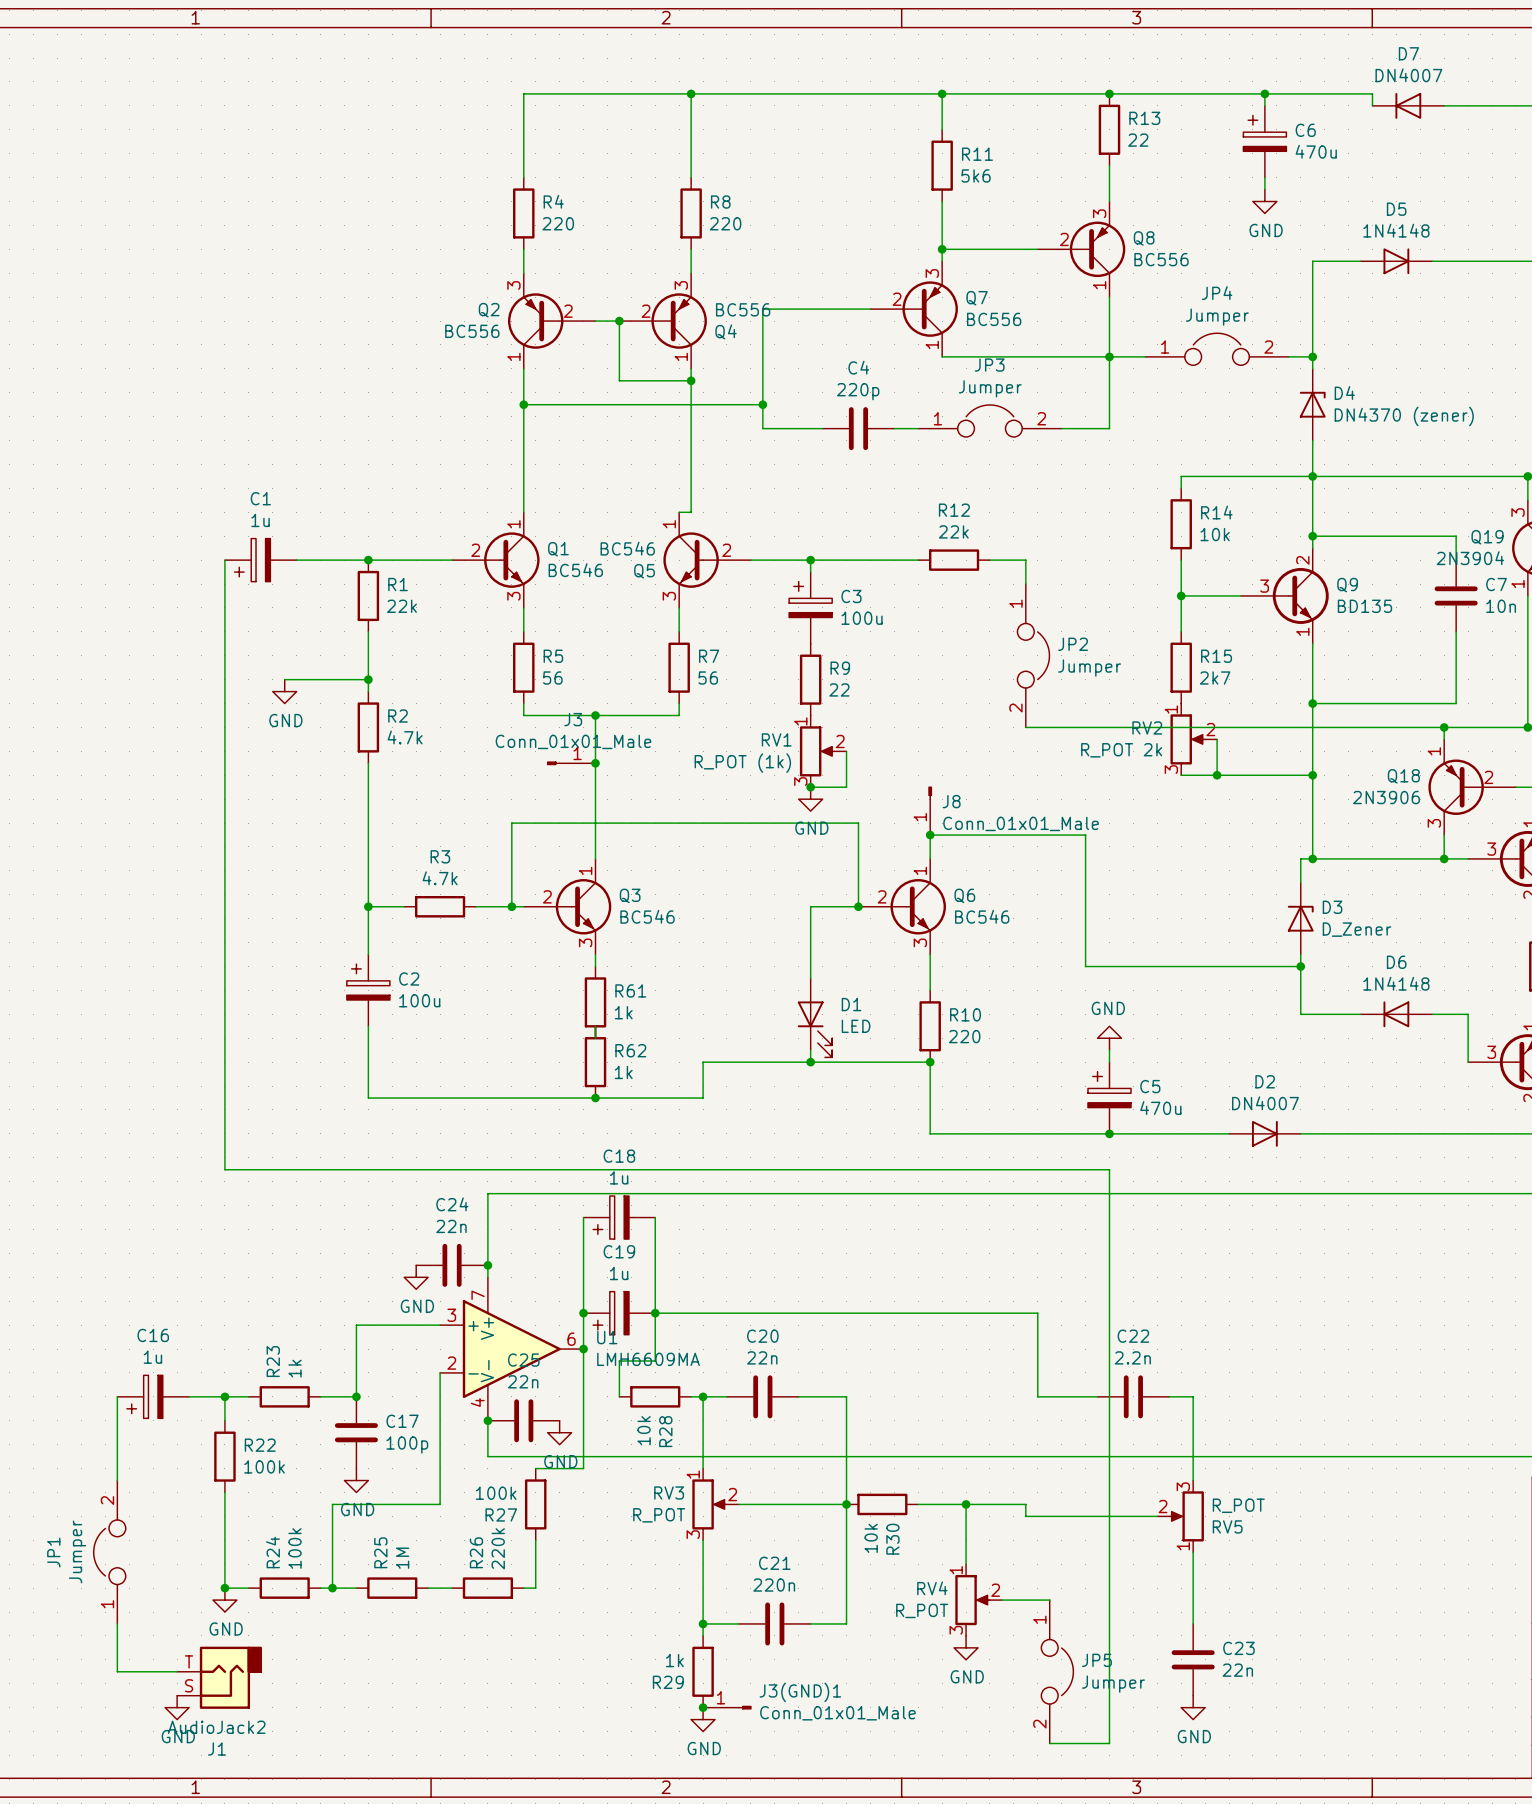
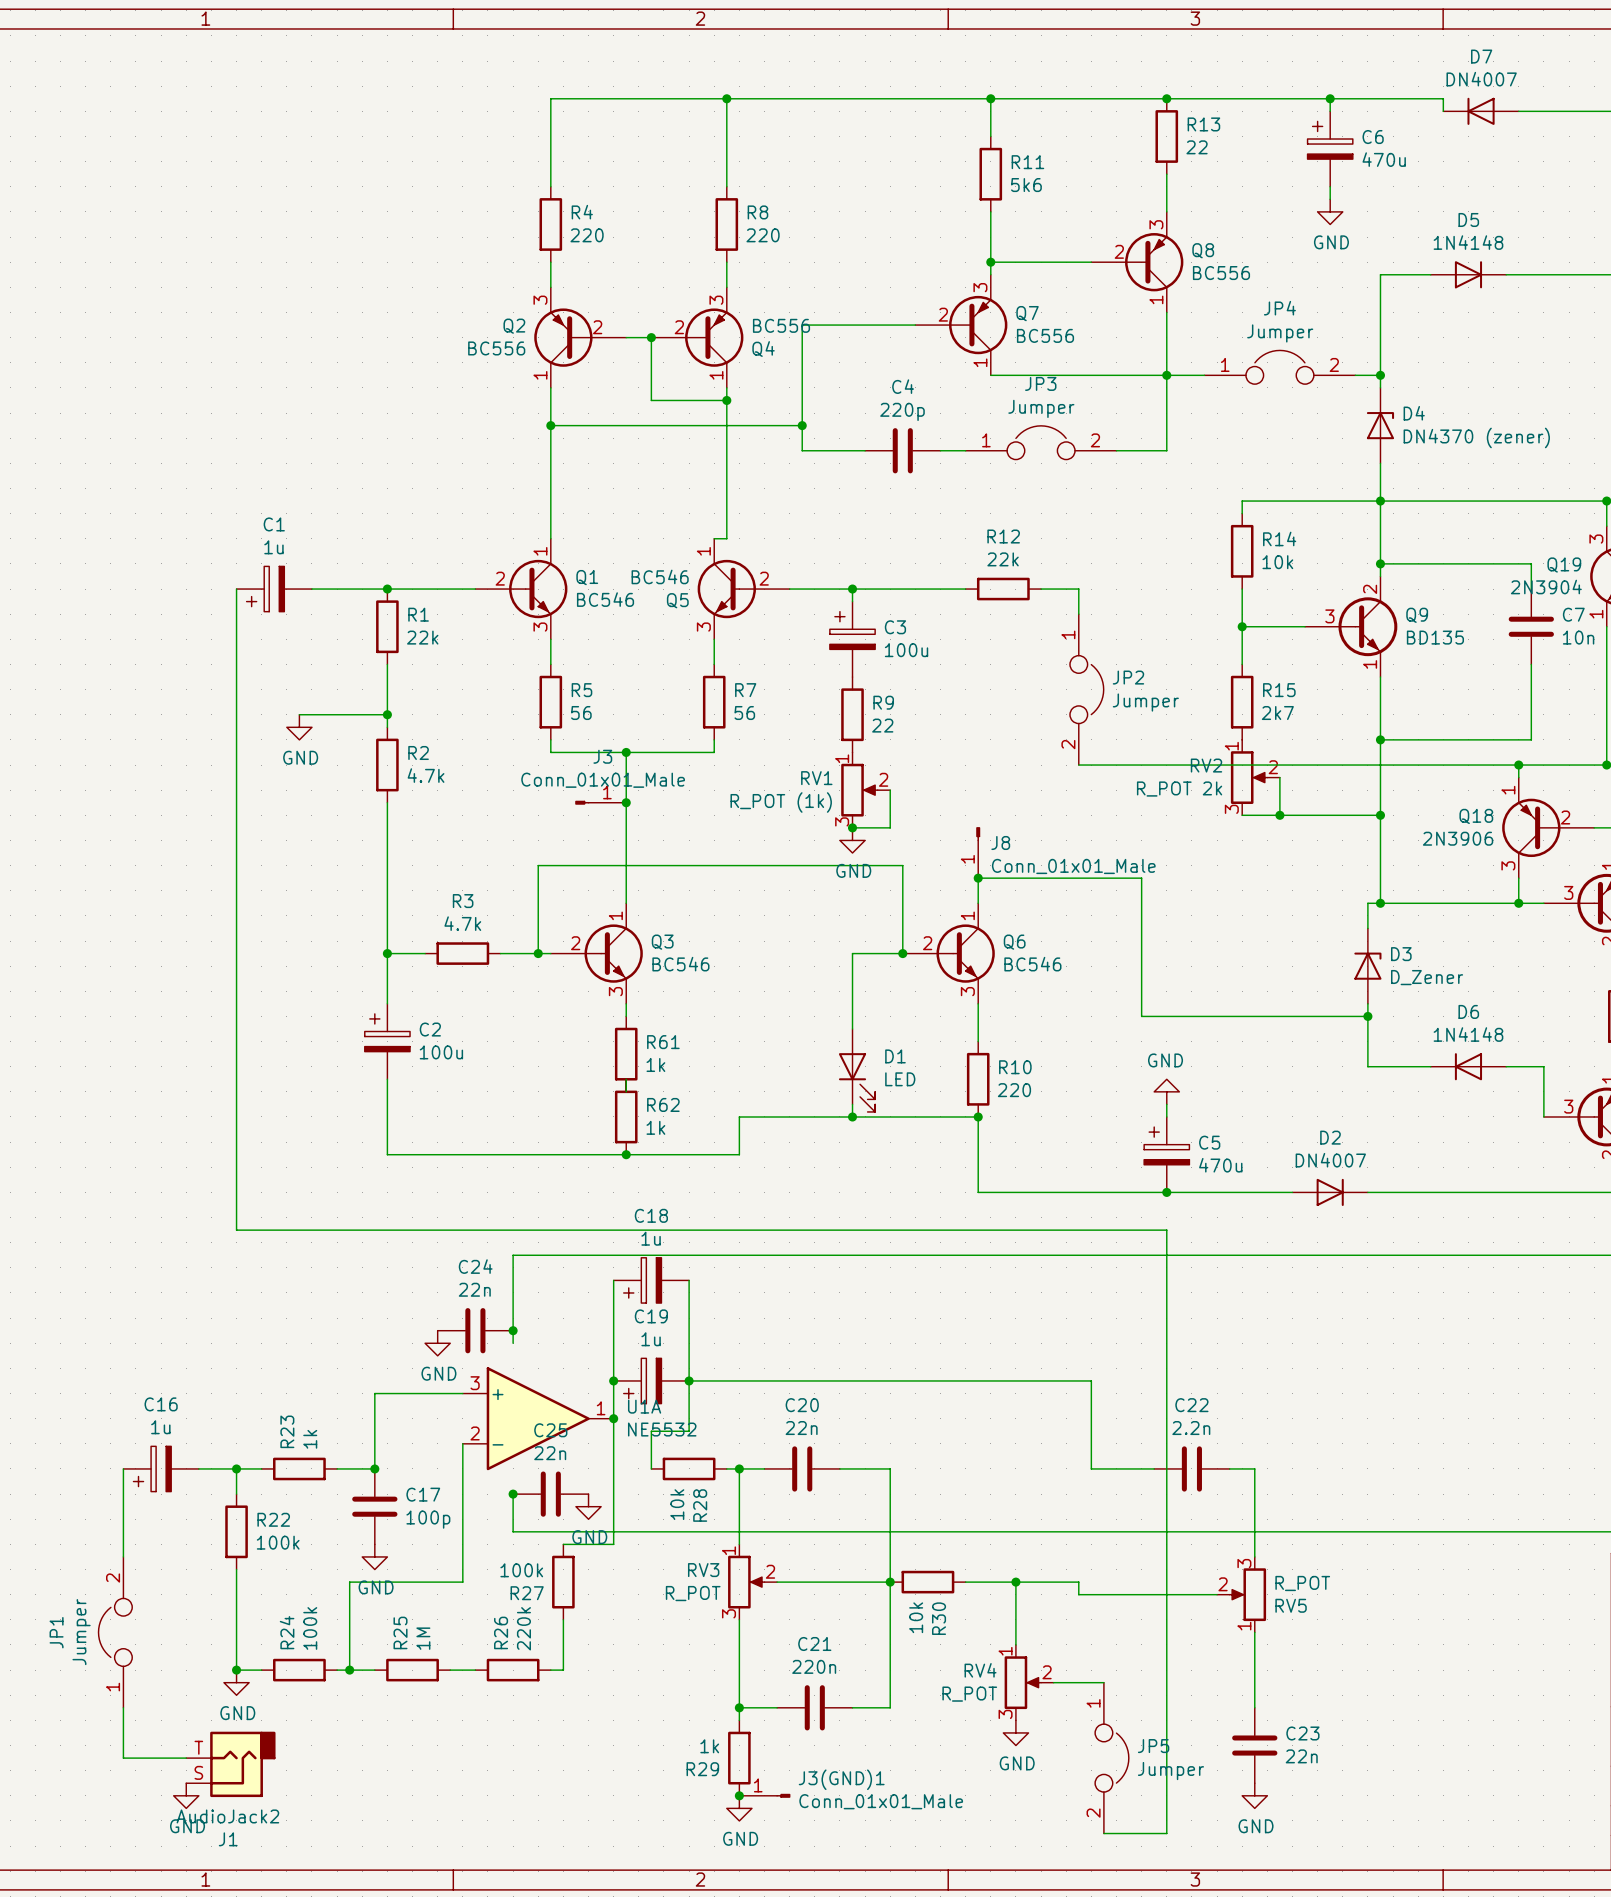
U1: LMH6609MA (511, 1349) -> none
U1A: none -> NE5532 (538, 1418)

